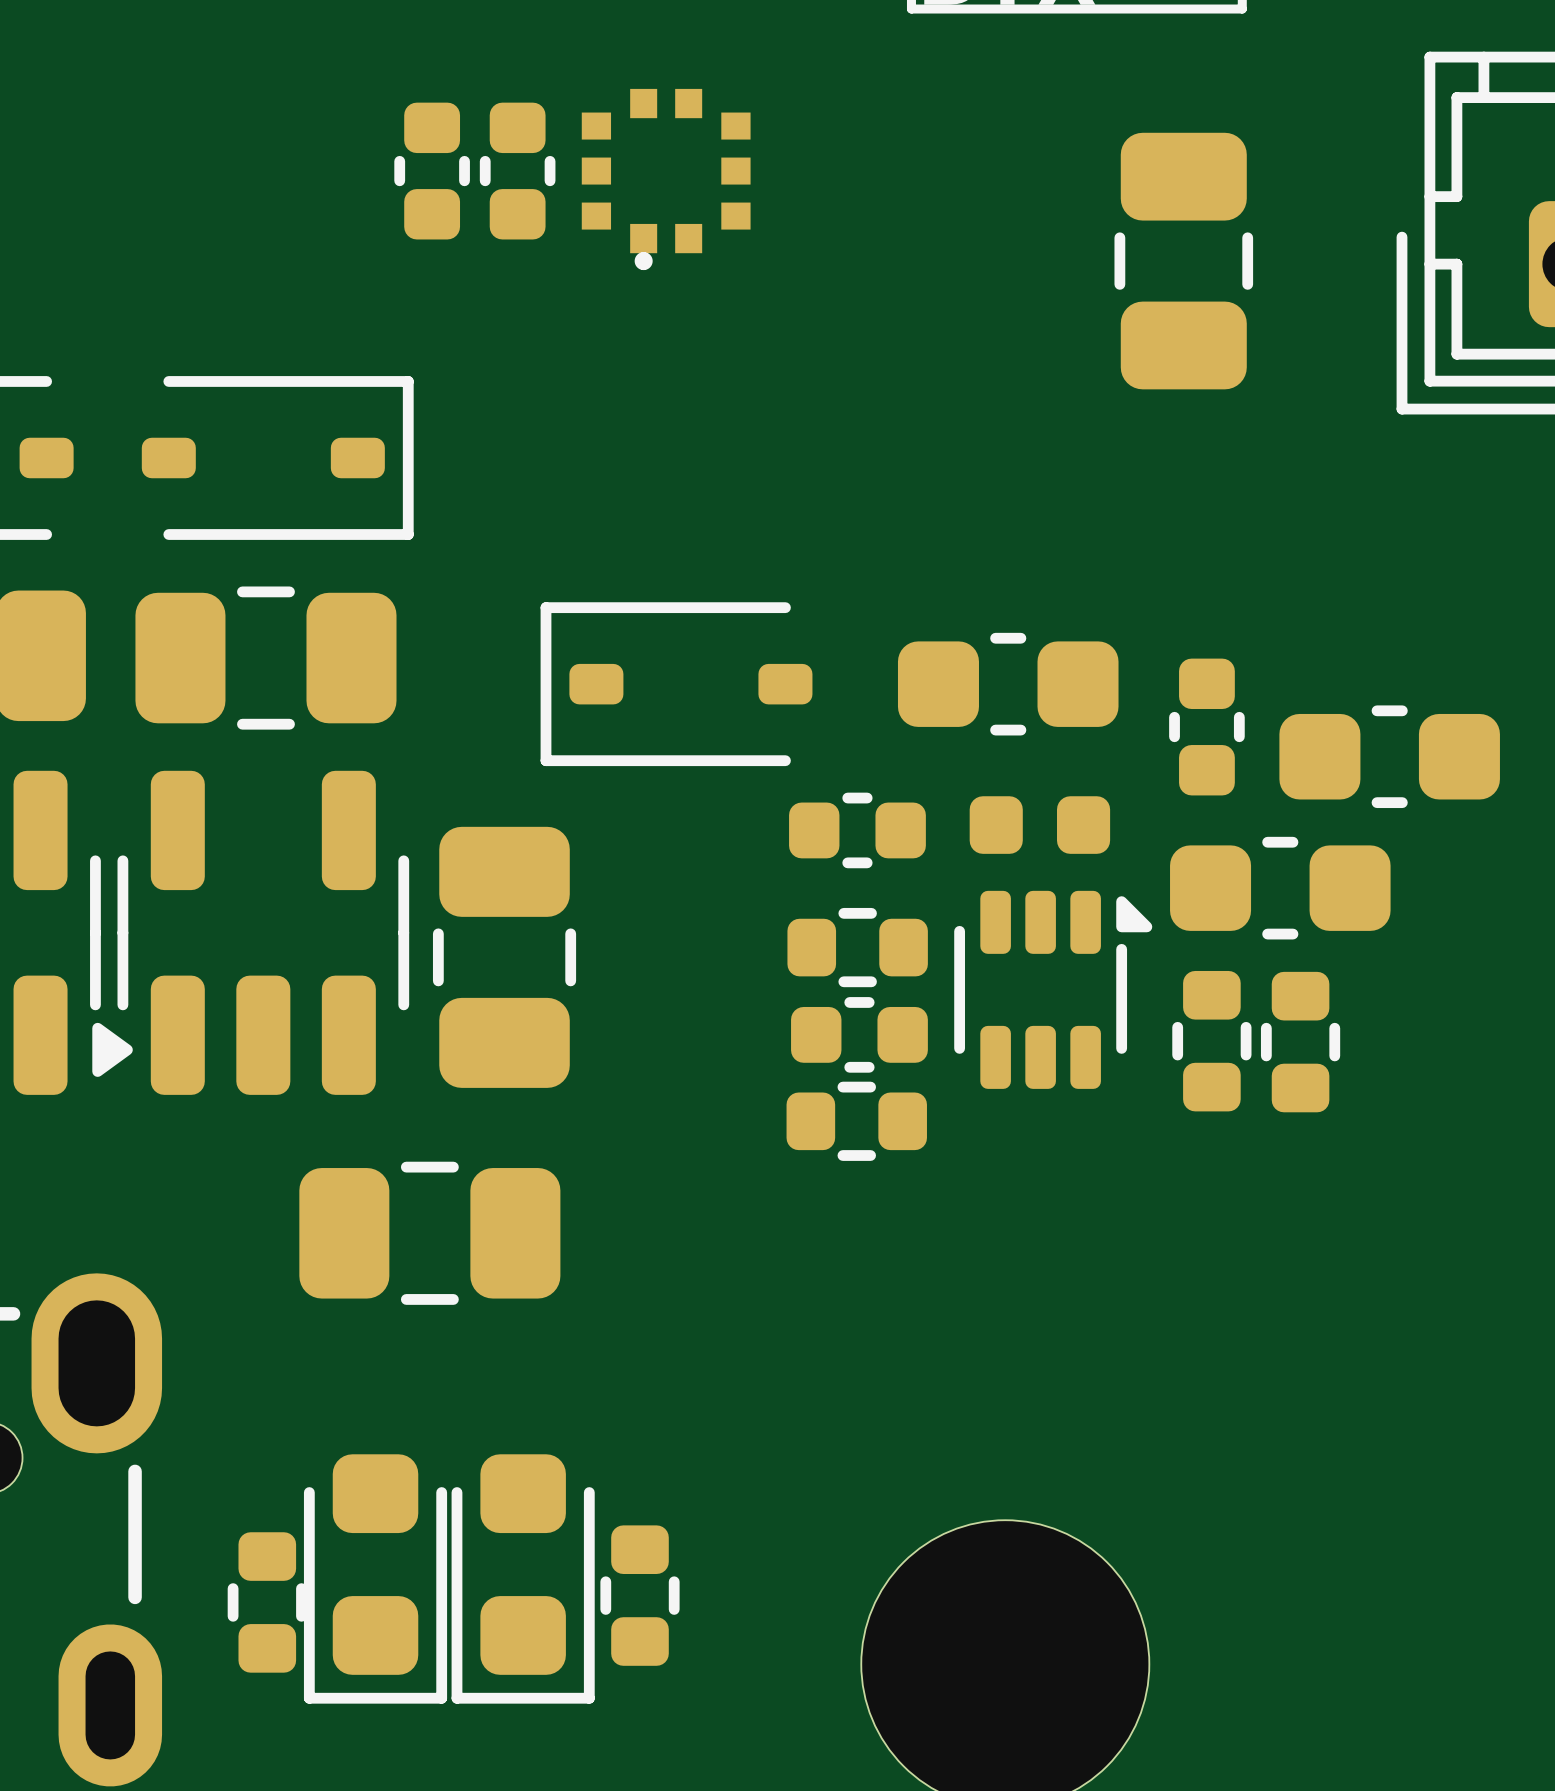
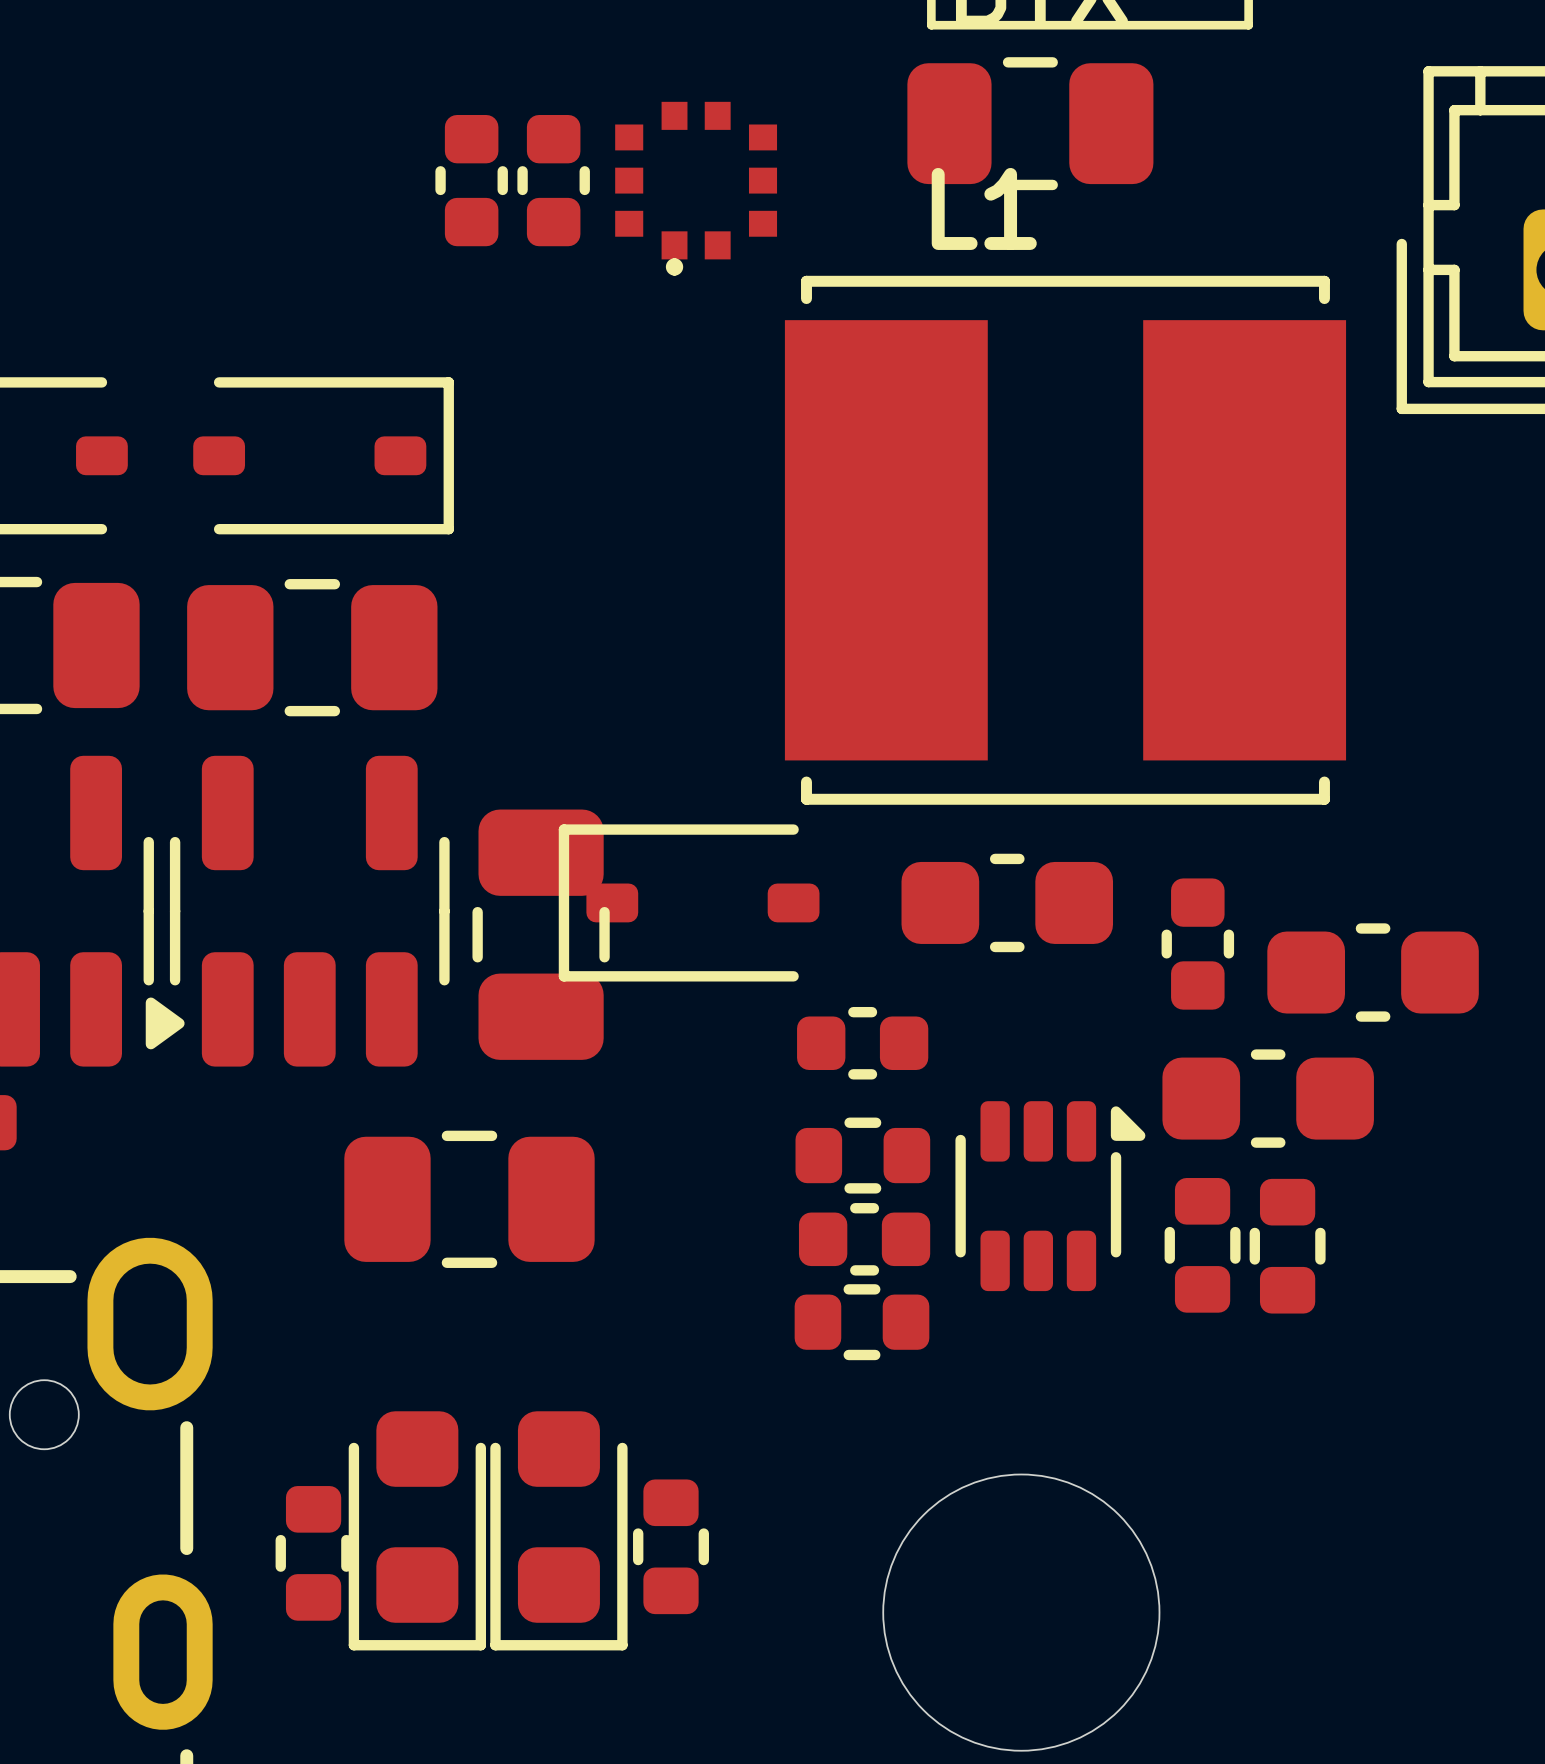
part rotation: 0° (1183, 261) -> 90° clockwise (1030, 123)
part position: (1183, 261) -> (1030, 123)
L1: none -> (1065, 540)
part position: (676, 684) -> (689, 902)
part: (1008, 684) -> none
part: (1206, 727) -> none
part: (1389, 756) -> none
part: (1039, 825) -> none
part: (857, 830) -> none
part: (1280, 888) -> none
part: none -> (1007, 902)
part: (857, 947) -> none
part: none -> (1197, 944)
part position: (1053, 989) -> (1050, 1196)
part: none -> (1373, 972)
part position: (859, 1034) -> (862, 1043)
part: (1211, 1041) -> none
part: (1300, 1042) -> none
part position: (856, 1121) -> (862, 1155)
part: none -> (1268, 1098)
part: none -> (864, 1239)
part: none -> (1202, 1245)
part: none -> (1287, 1246)
part: none -> (861, 1322)

